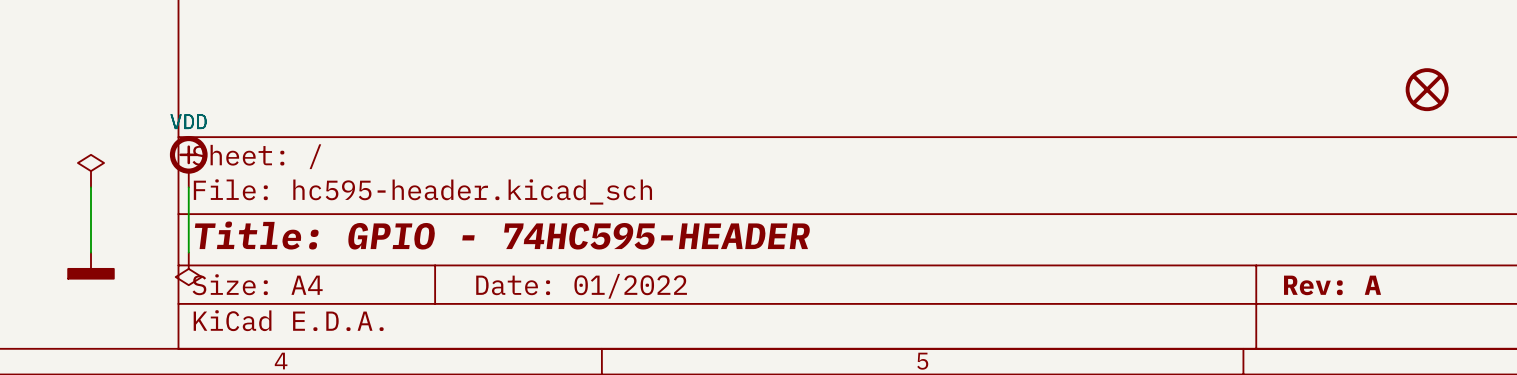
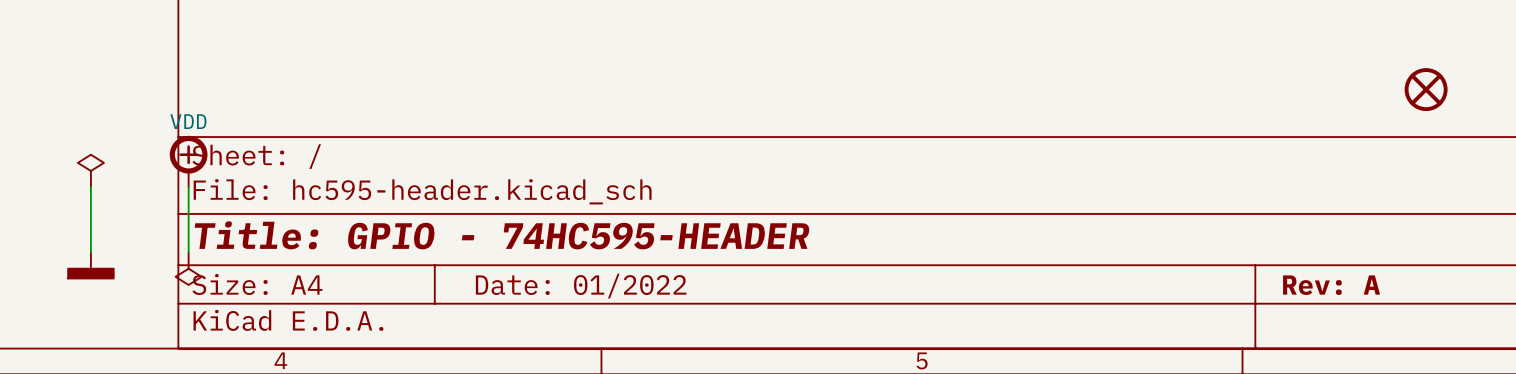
power symbol text: VDD (188, 121) -> none

